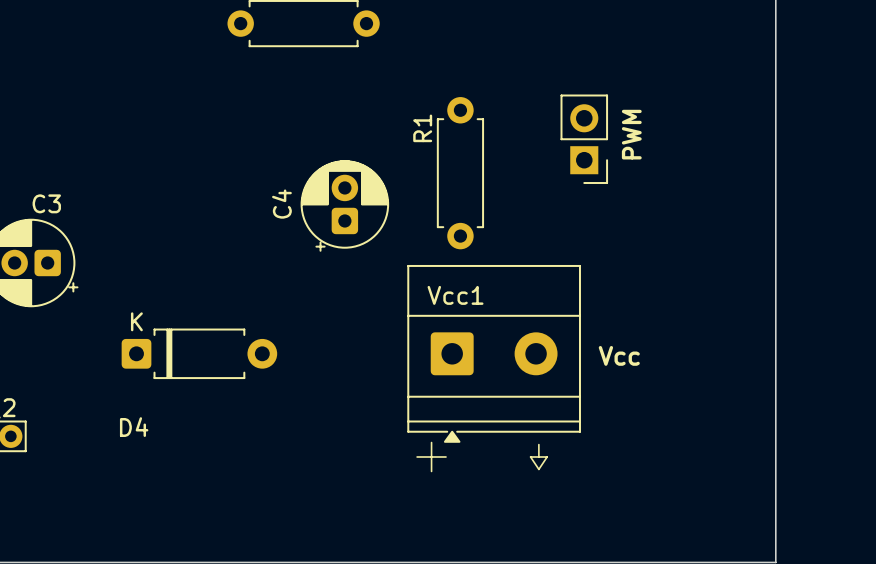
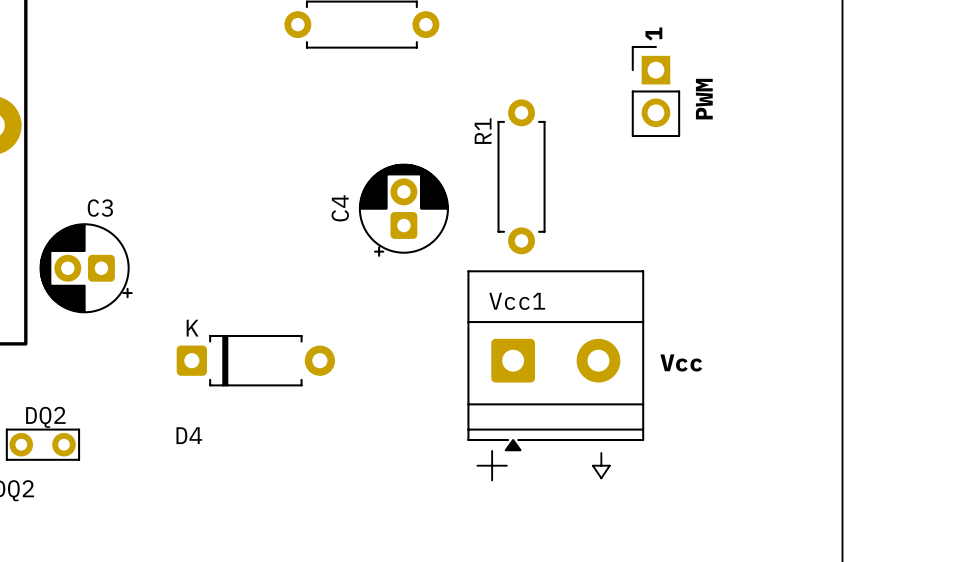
text: none -> 1 (653, 34)
text position: PWM (631, 134) -> PWM (704, 99)
part rotation: 0° (584, 139) -> 180° (655, 91)

